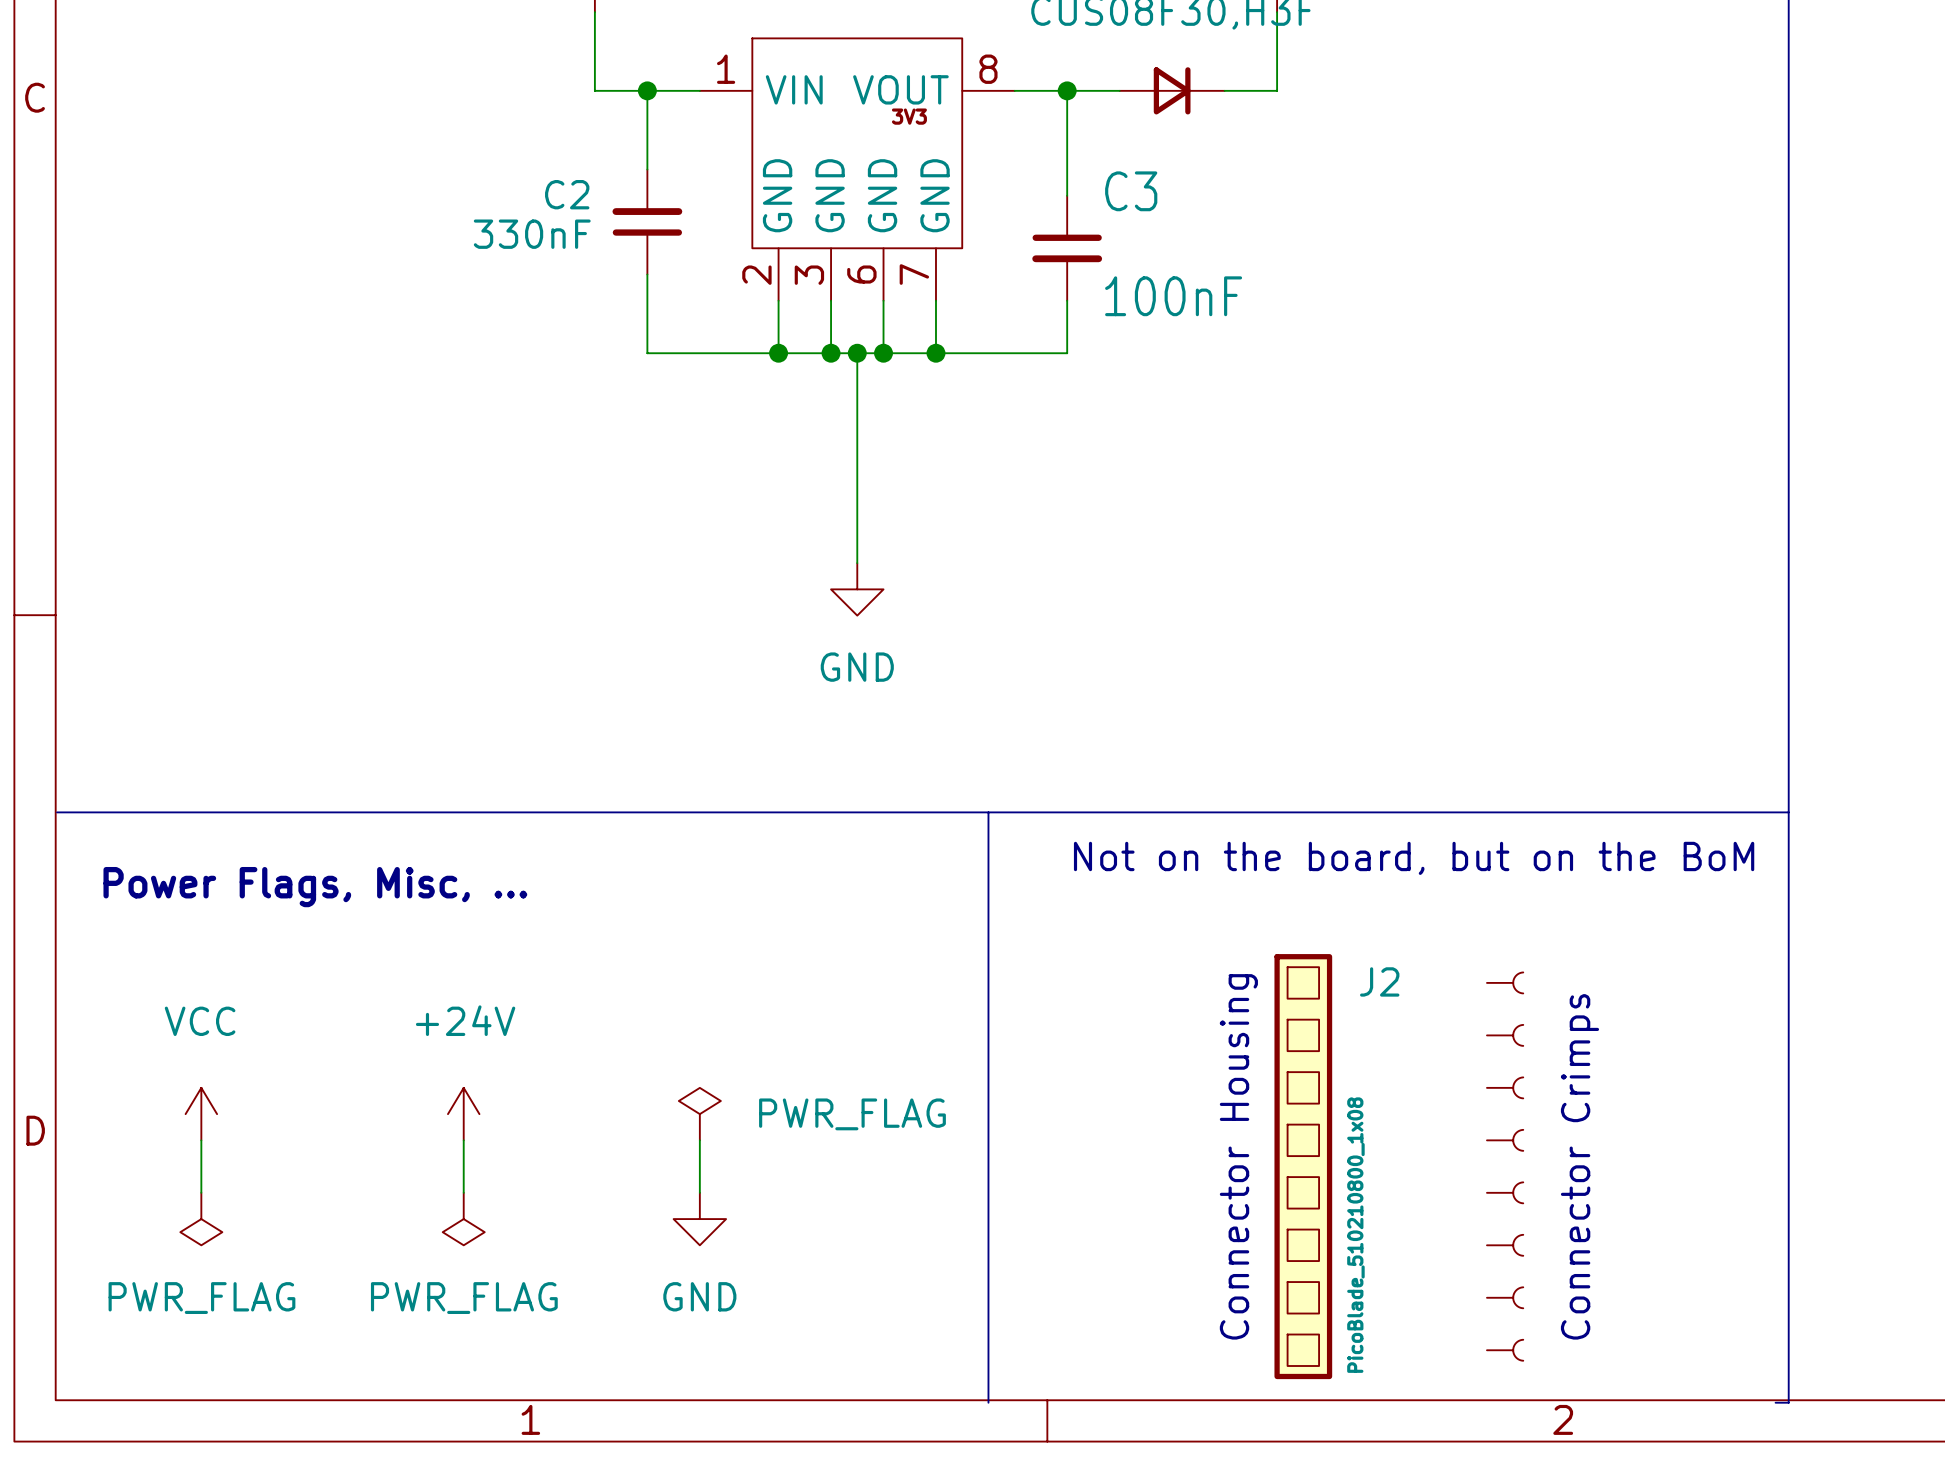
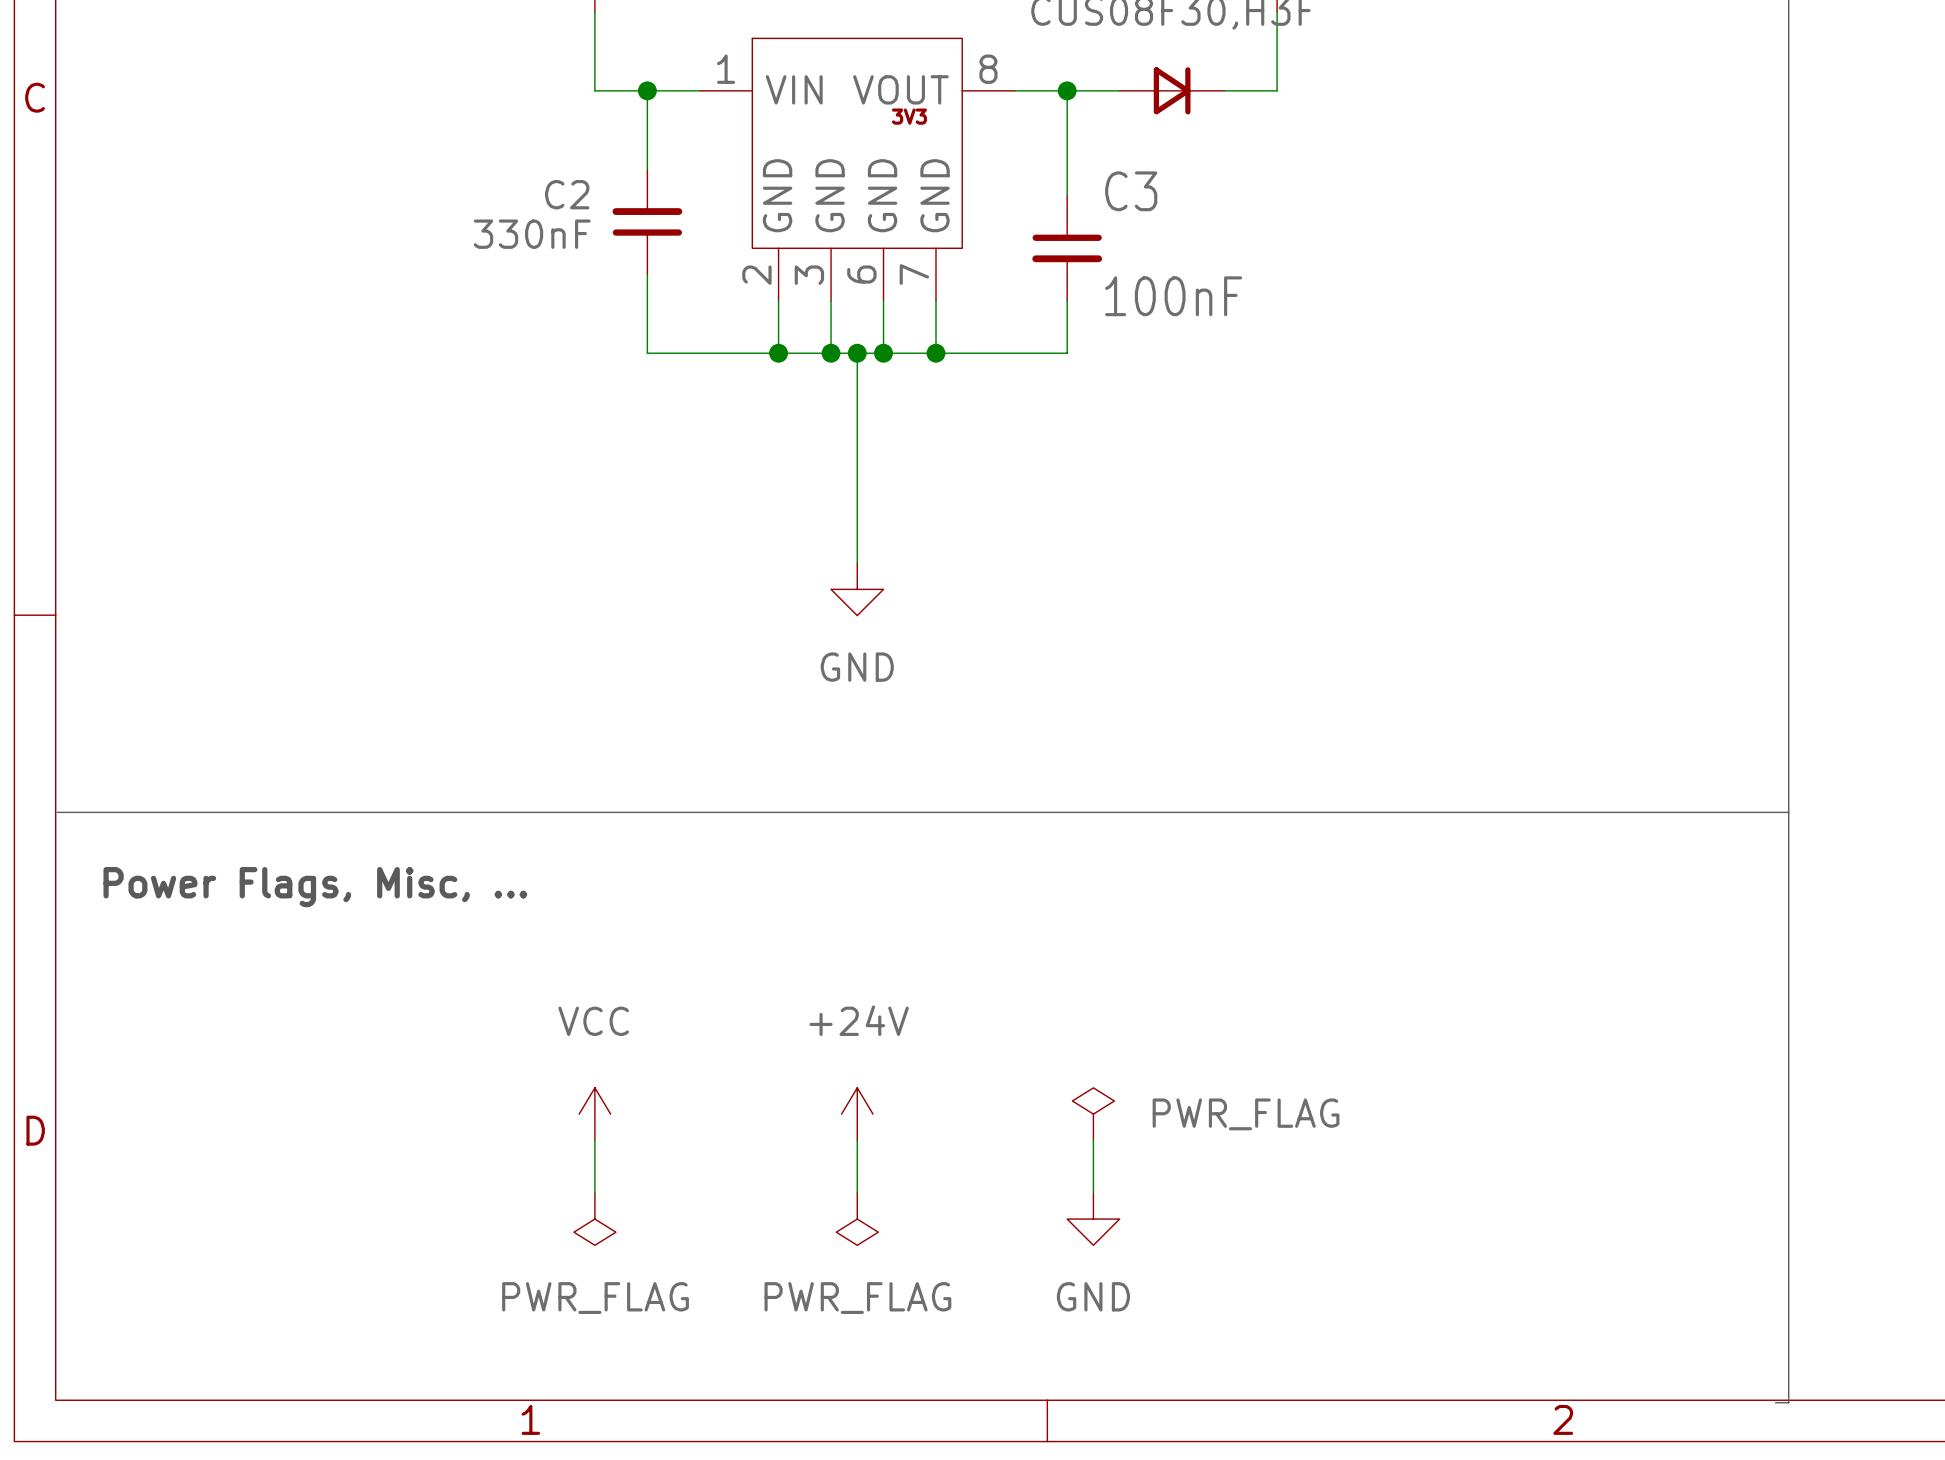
line: (988, 812) (988, 1402) -> none
text: Not on the board, but on the BoM (1414, 858) -> none
part: (1505, 982) -> none
part: (1505, 1035) -> none
part: (1505, 1087) -> none
power symbol position: VCC (201, 1114) -> VCC (594, 1114)
power symbol position: +24V (463, 1114) -> +24V (857, 1114)
power symbol: PWR_FLAG (699, 1114) -> none
power symbol: none -> PWR_FLAG (1093, 1114)
wire: (201, 1140) (201, 1192) -> (594, 1140) (594, 1192)
wire: (463, 1140) (463, 1192) -> (857, 1140) (857, 1192)
wire: (699, 1140) (699, 1192) -> (1093, 1140) (1093, 1192)
part: (1505, 1140) -> none
text: Connector Housing (1238, 1156) -> none
J2: PicoBlade_510210800_1x08 (1303, 1166) -> none
text: Connector Crimps (1579, 1166) -> none
part: (1505, 1192) -> none
power symbol: PWR_FLAG (201, 1219) -> none
power symbol: PWR_FLAG (463, 1219) -> none
power symbol: none -> PWR_FLAG (594, 1219)
power symbol position: GND (699, 1219) -> GND (1093, 1219)
power symbol: none -> PWR_FLAG (857, 1219)
part: (1505, 1245) -> none
part: (1505, 1297) -> none
part: (1505, 1350) -> none

